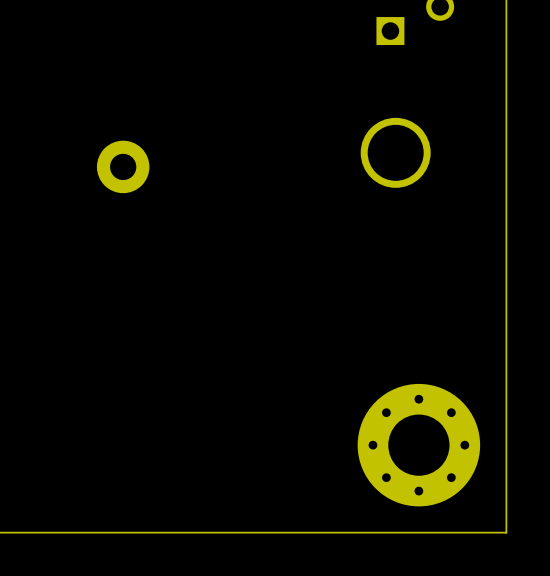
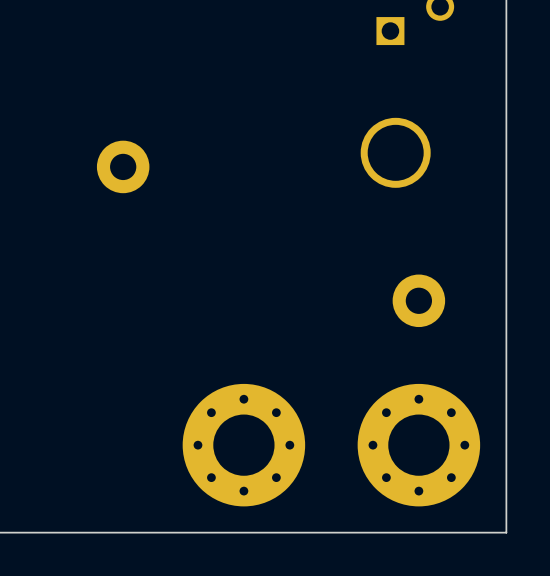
part: none -> (418, 300)
part: none -> (243, 445)

